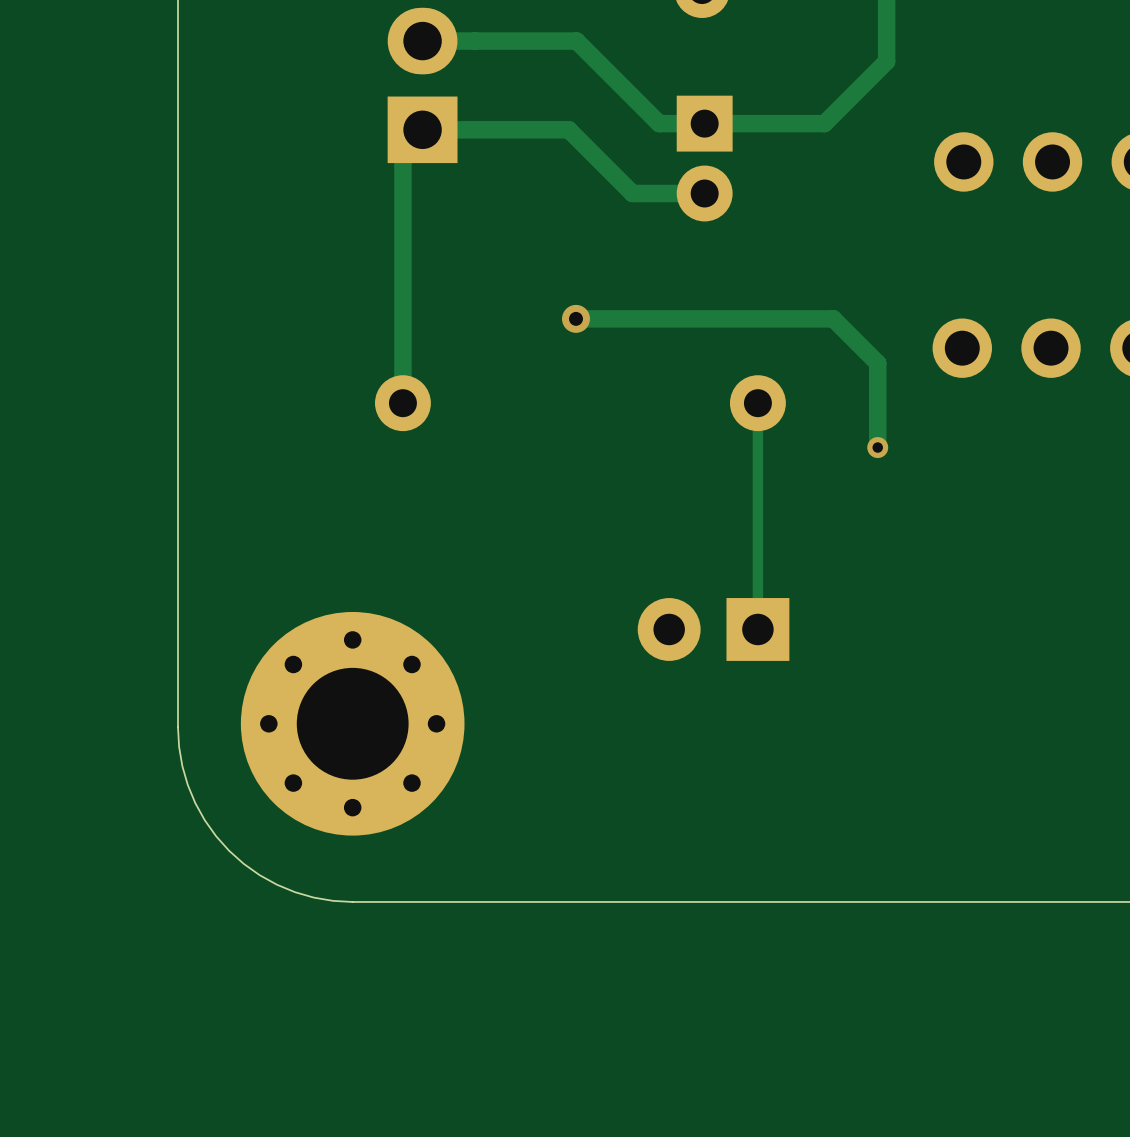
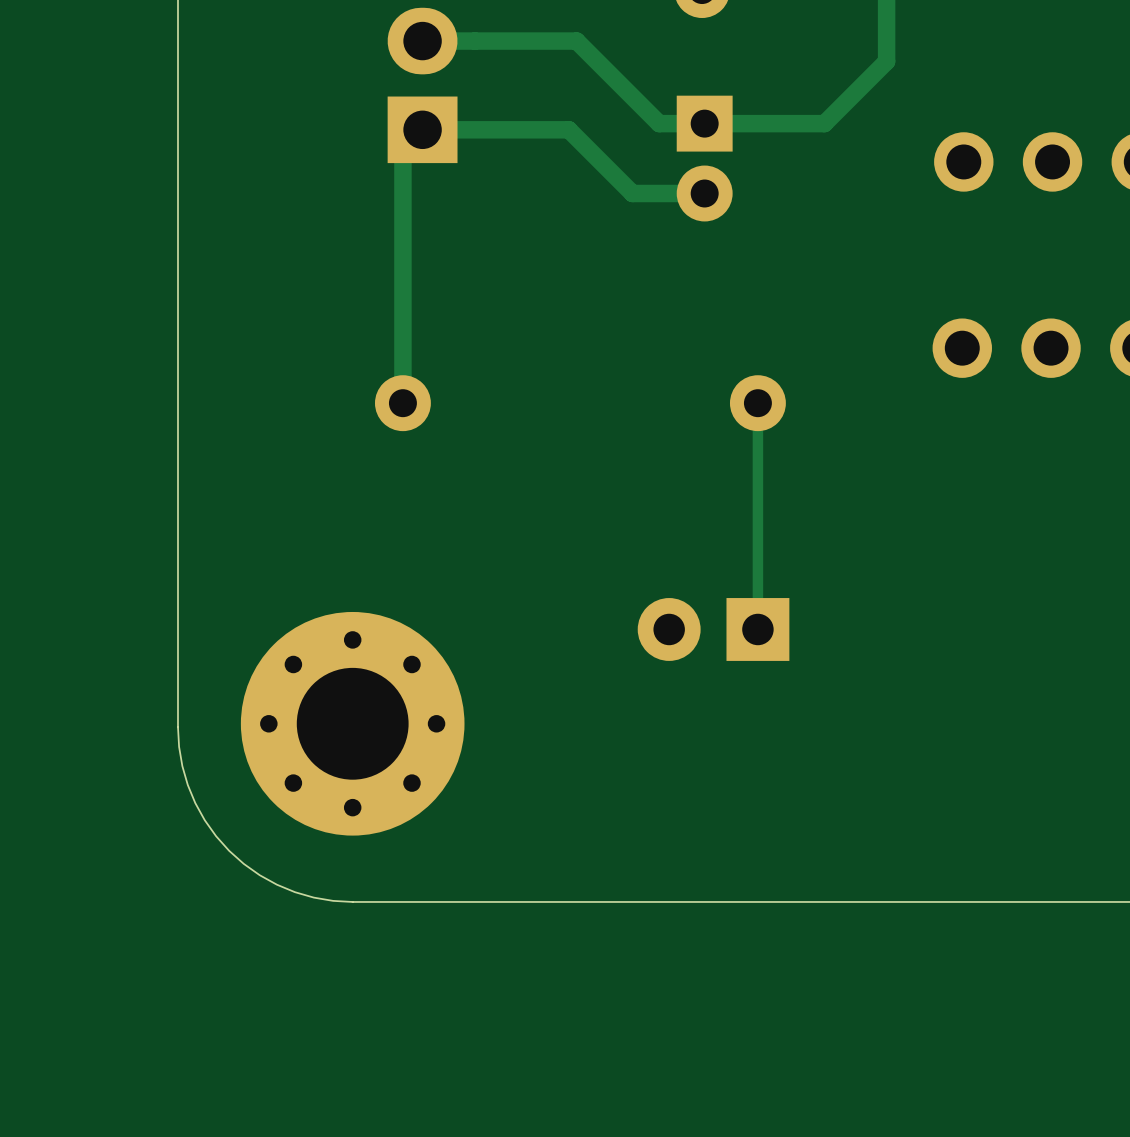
track: (575, 318) (833, 318) (877, 363) (877, 447) -> none
via: (575, 318) -> none
via: (877, 447) -> none

